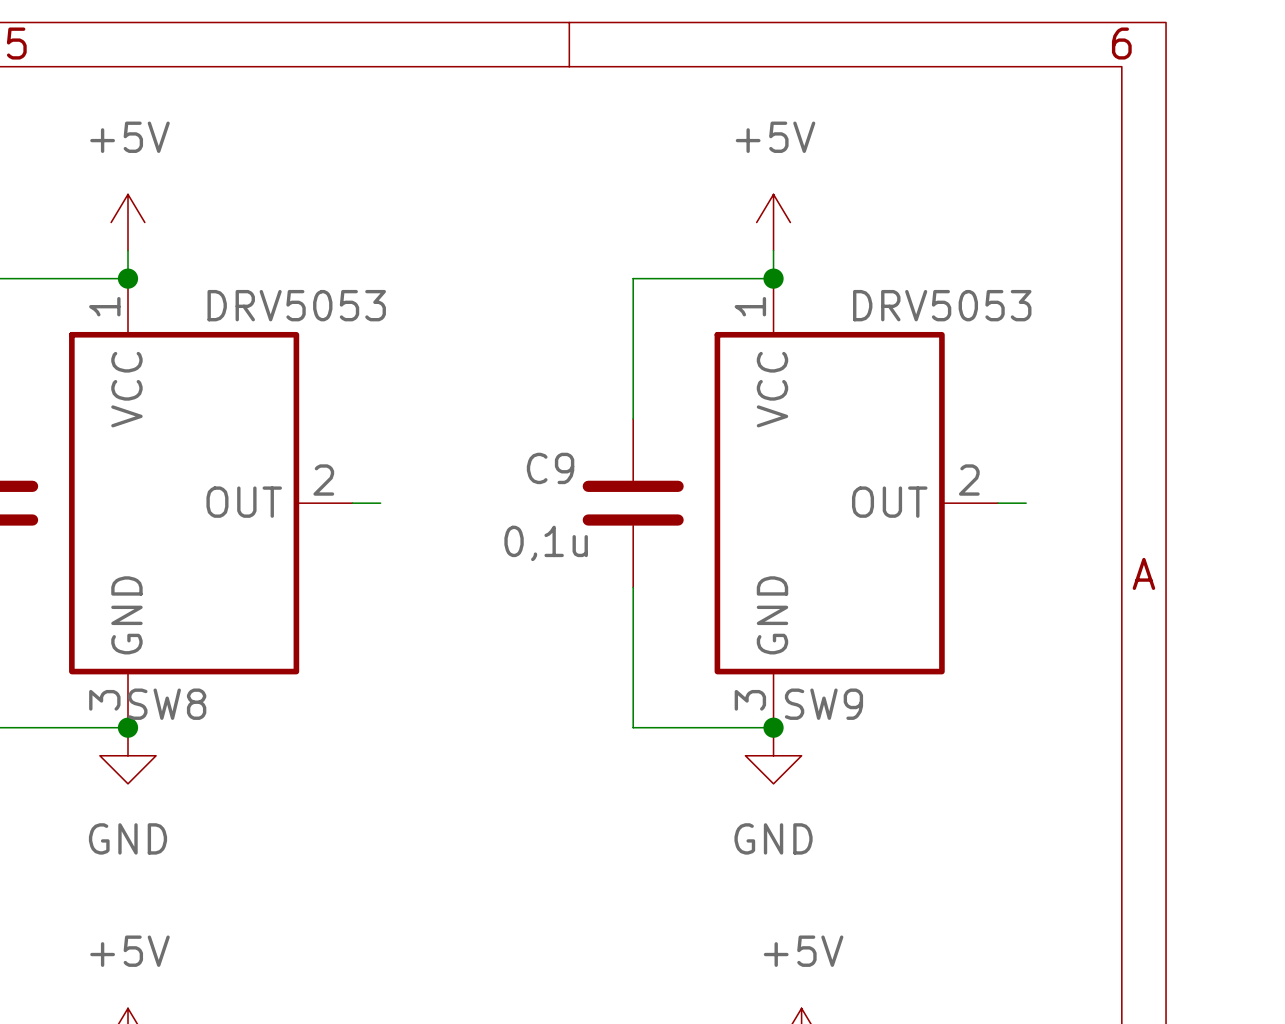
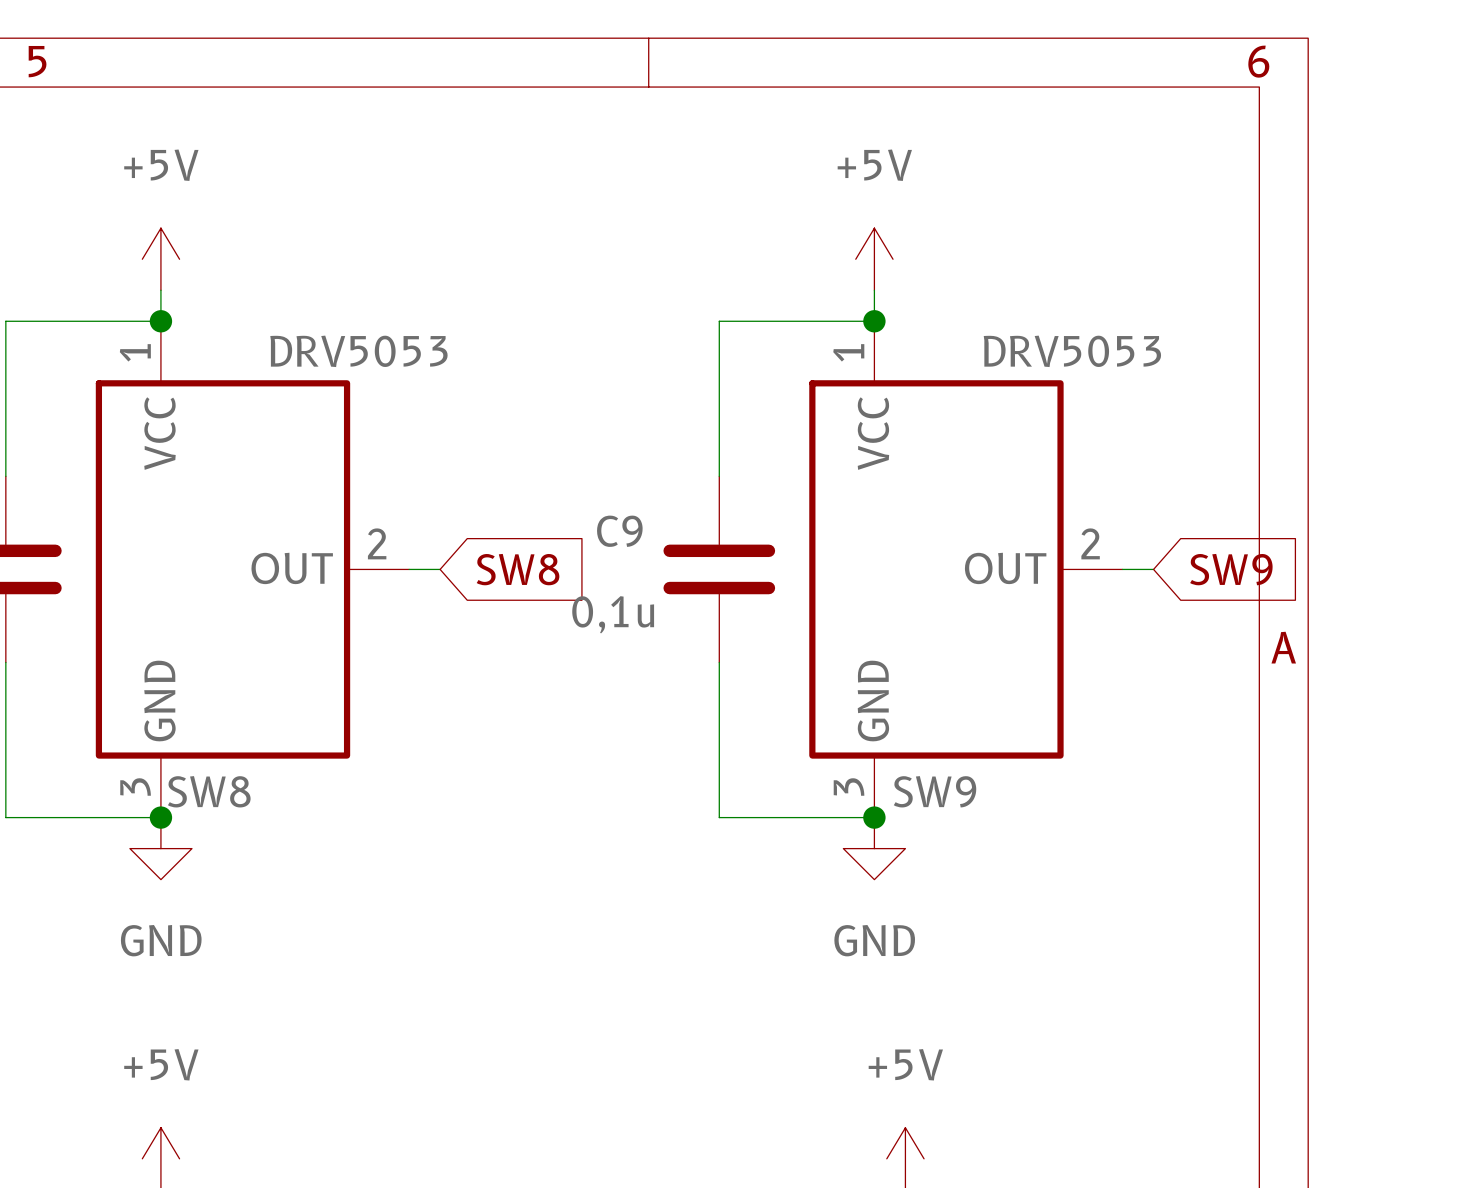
global label: none -> SW8 (518, 569)
global label: none -> SW9 (1231, 569)

